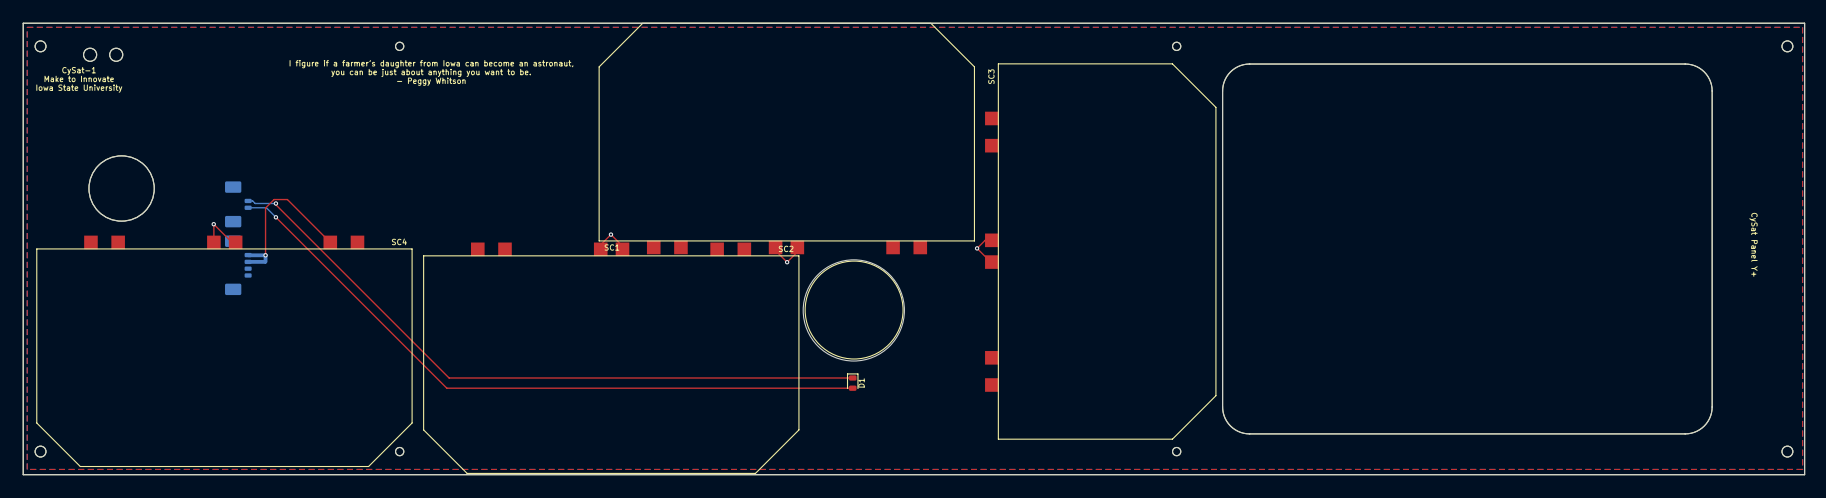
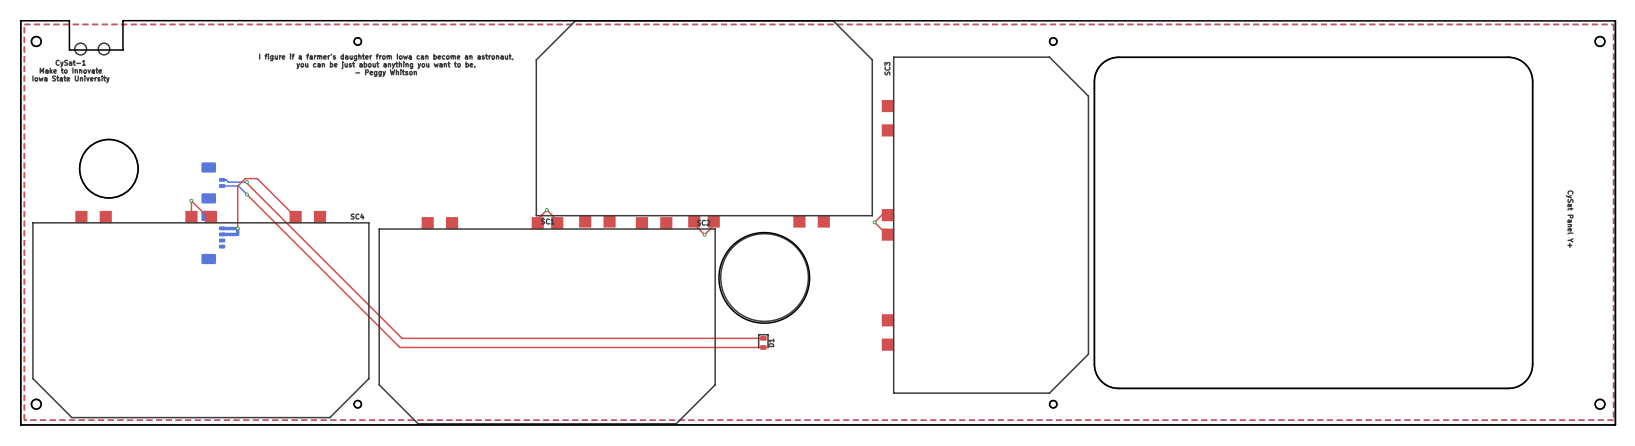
line: (23, 23) (1804, 23) -> none
board edge: (77, 23) (1804, 23) -> (69, 20) (69, 50) (122, 50) (122, 20) (1615, 20)
round board edge: [83, 48, 97, 62] -> none
round board edge: [109, 48, 123, 62] -> none

